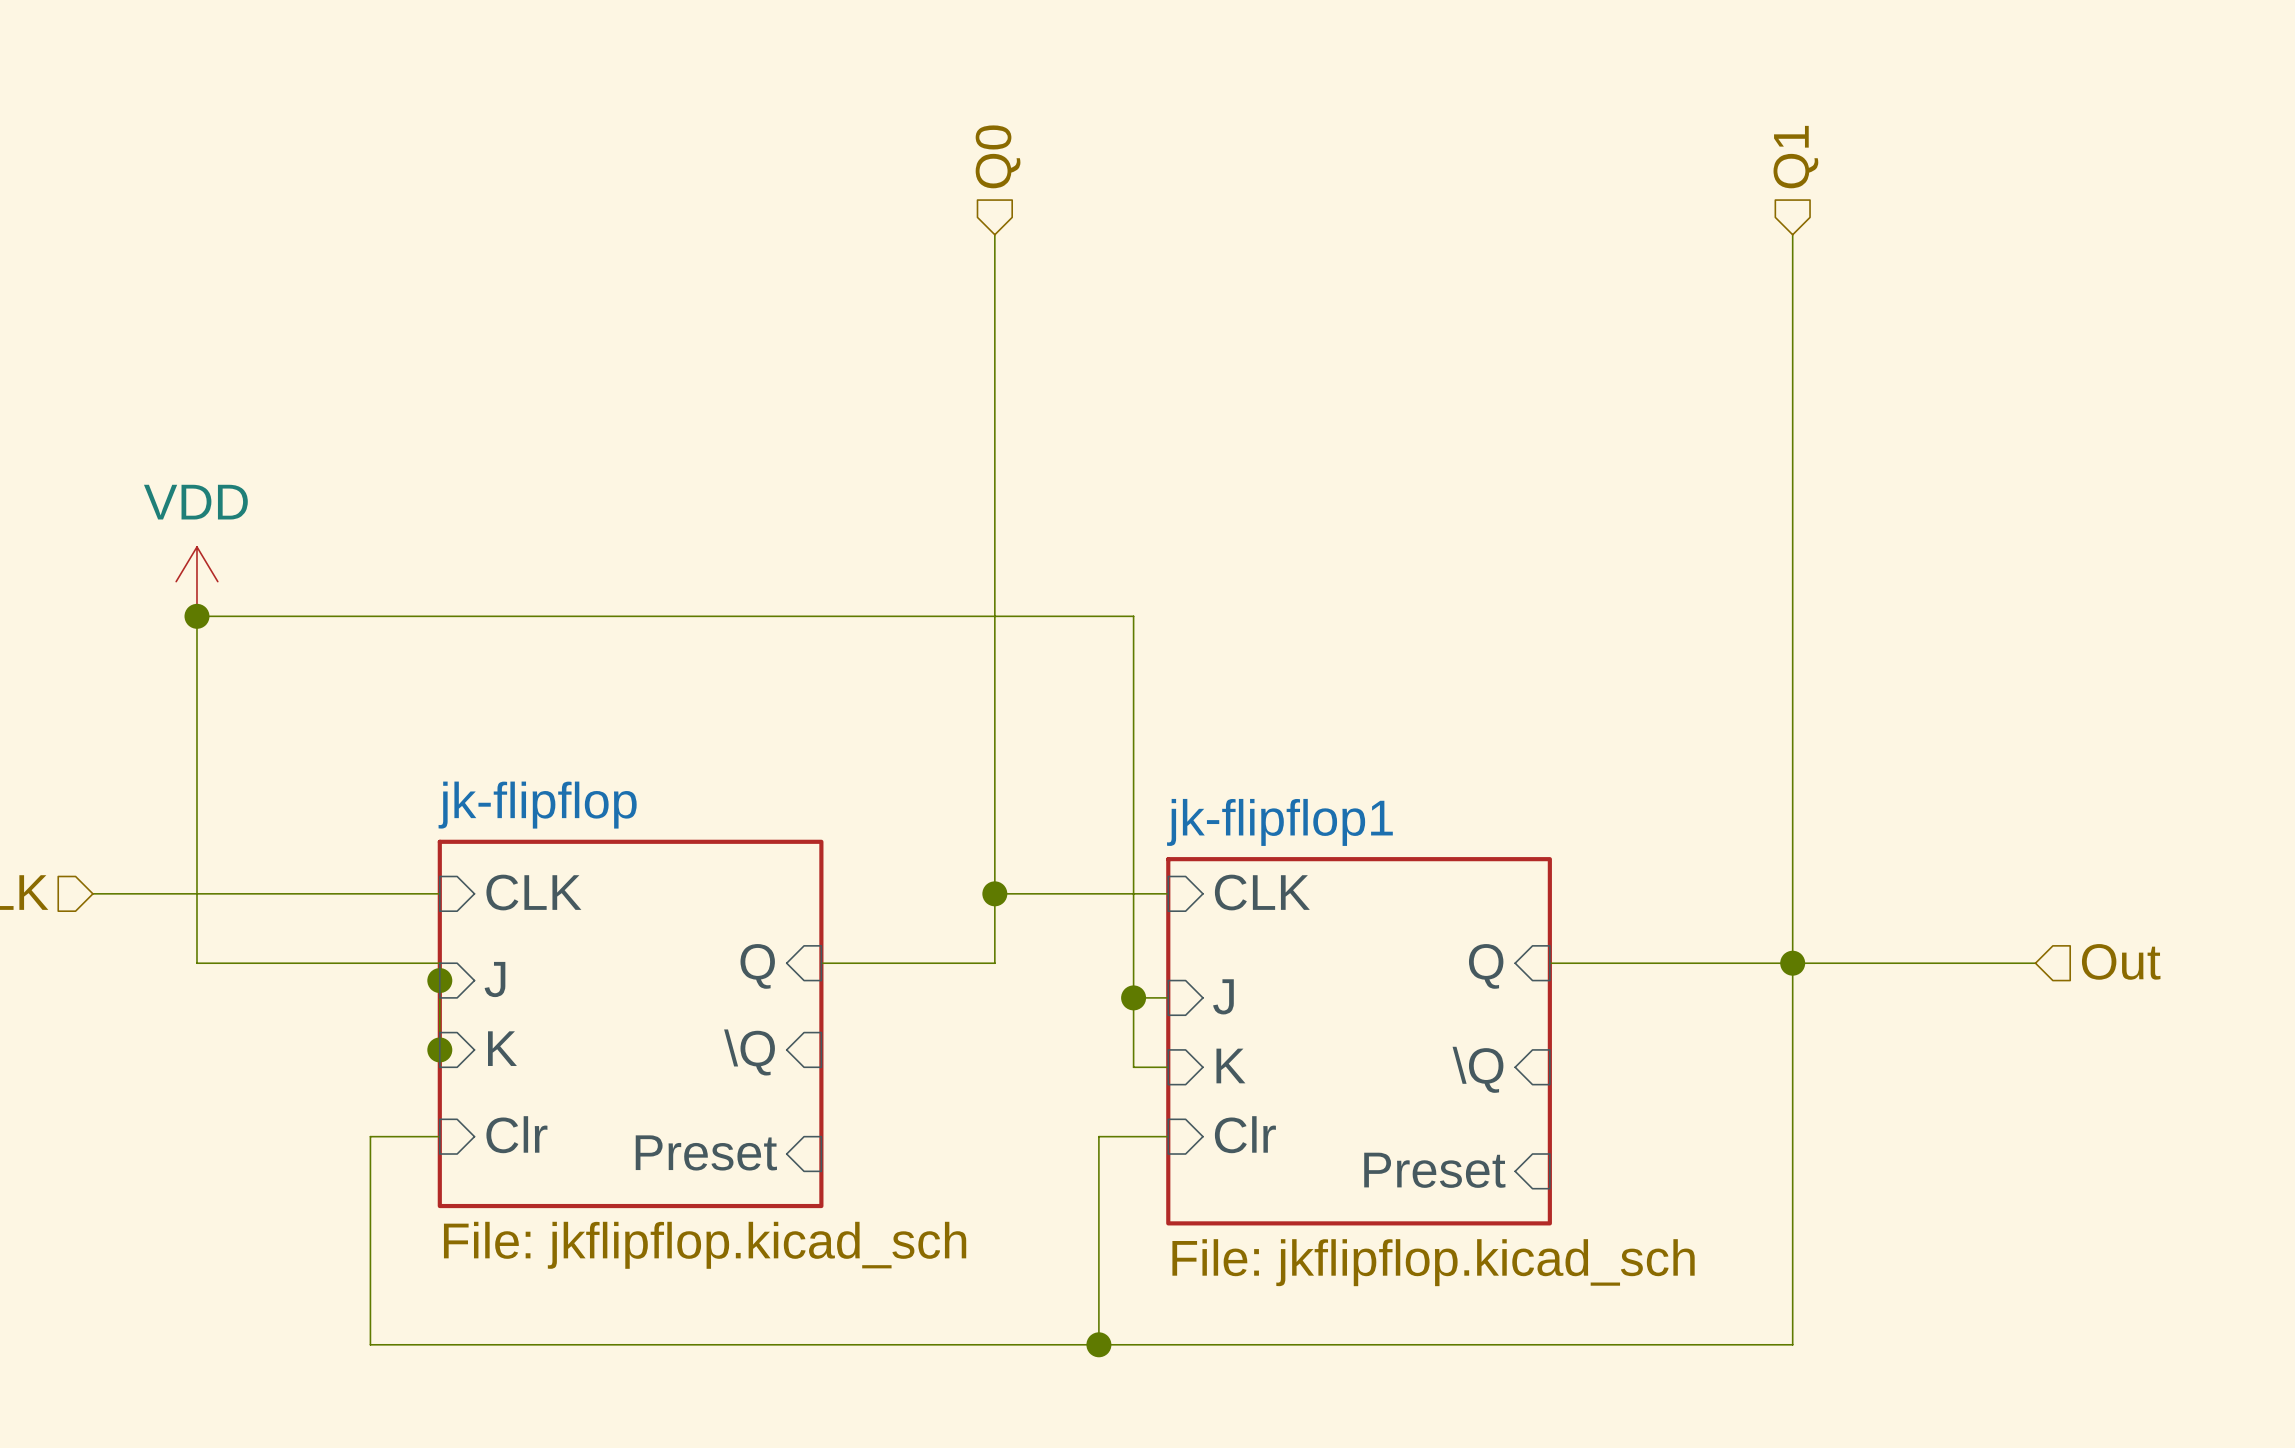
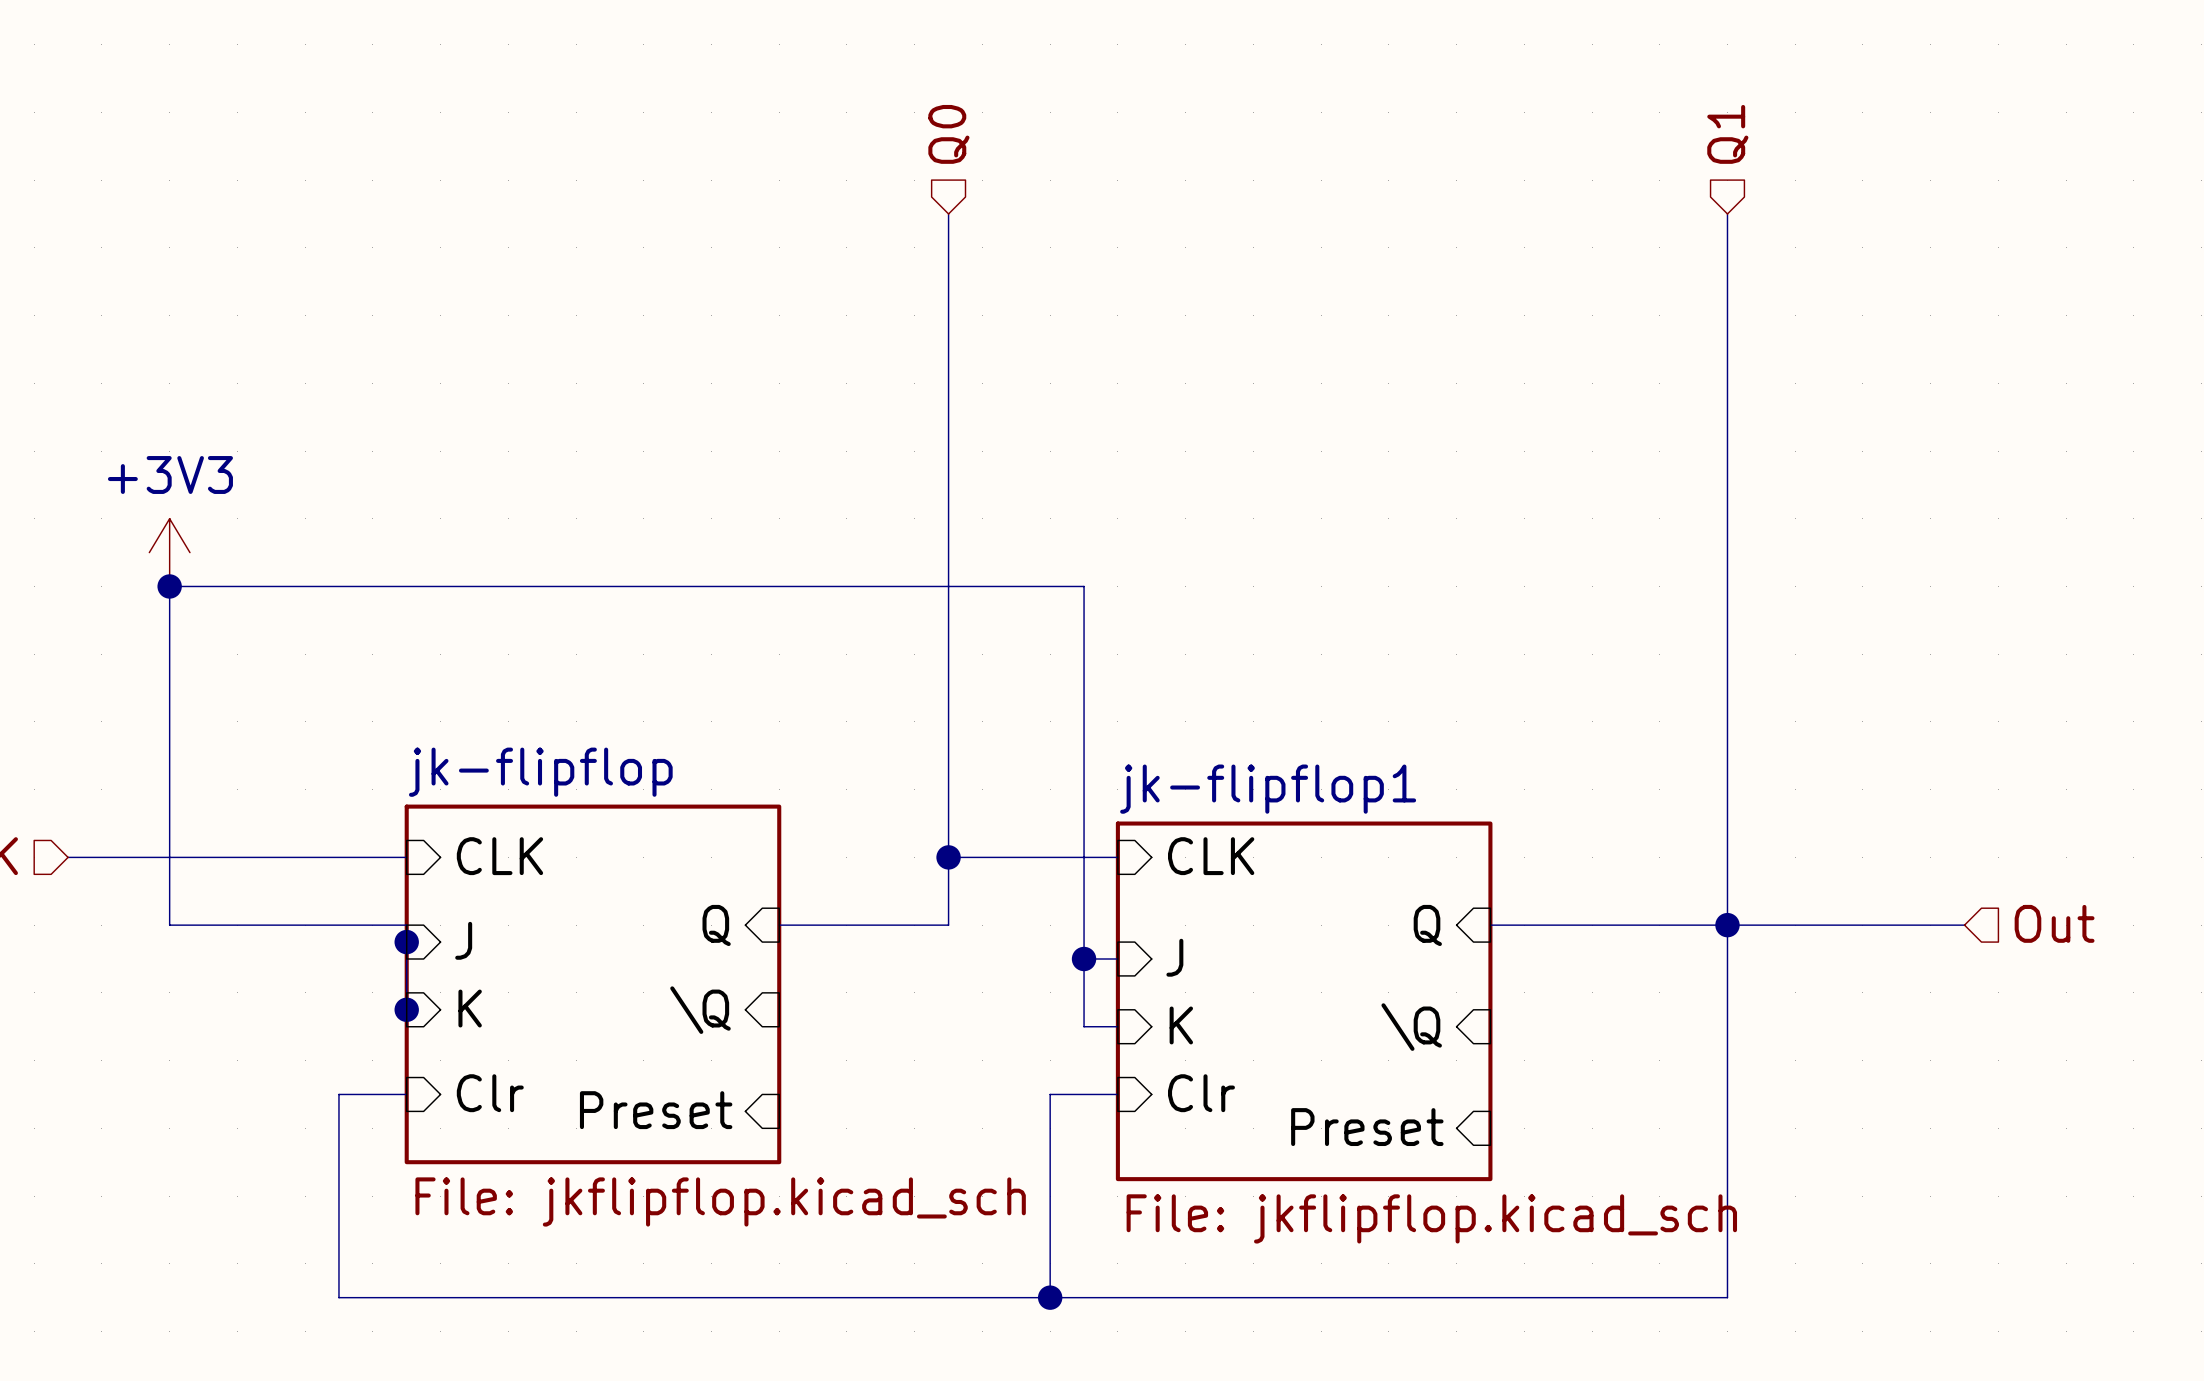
power symbol: VDD (196, 581) -> +3V3 (169, 552)

